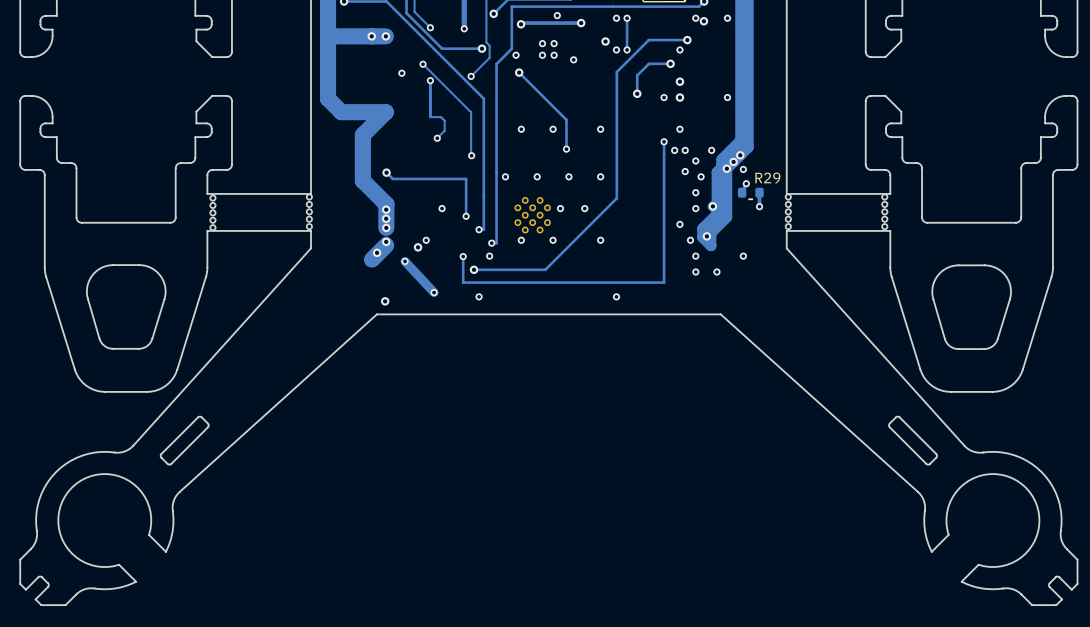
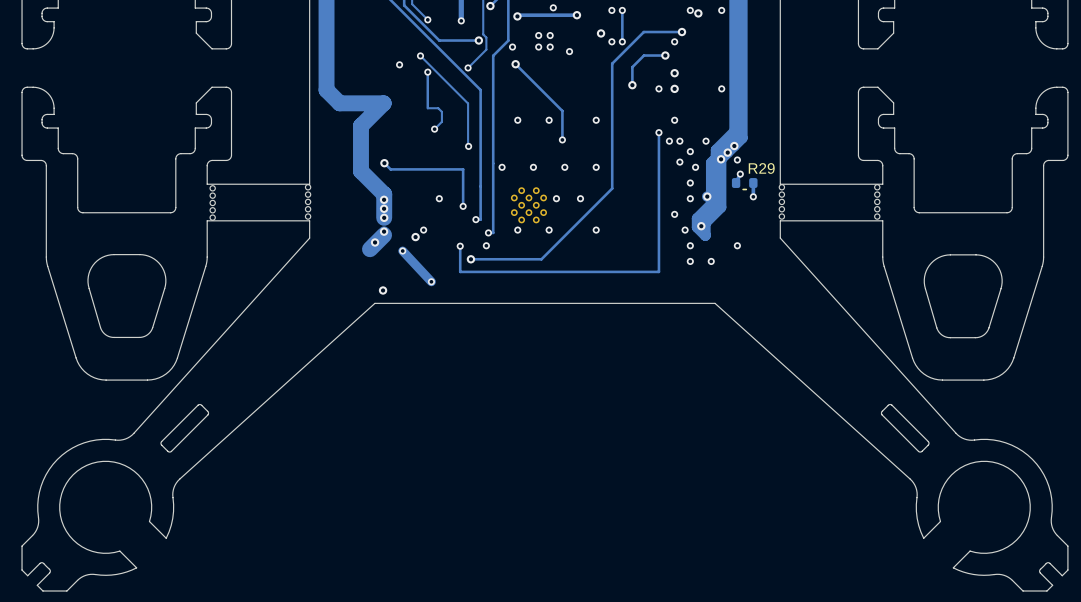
via: (371, 36) -> none
track: (385, 36) (328, 36) -> none
via: (385, 36) -> none
via: (479, 296) -> none
via: (616, 296) -> none

